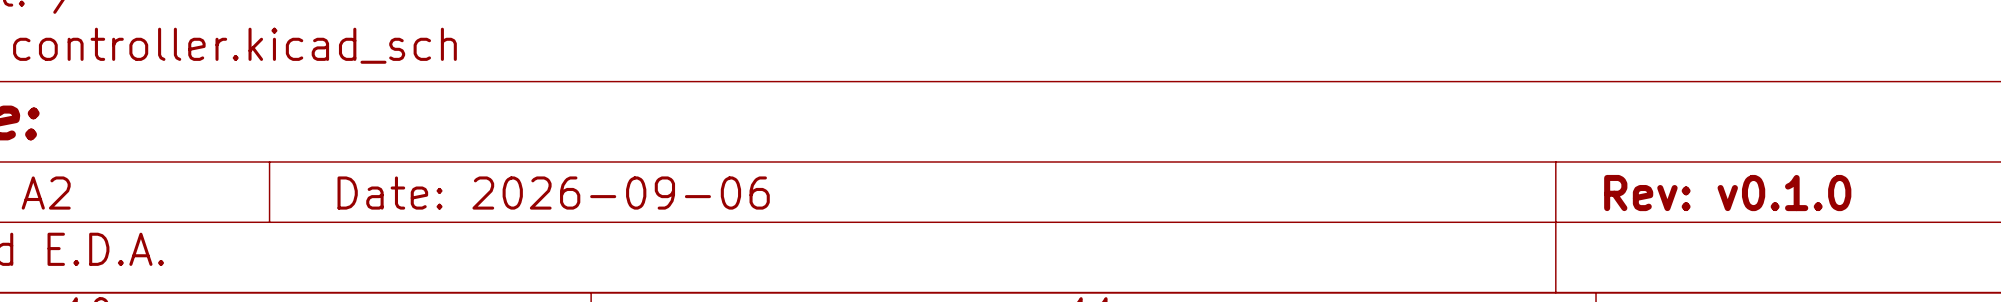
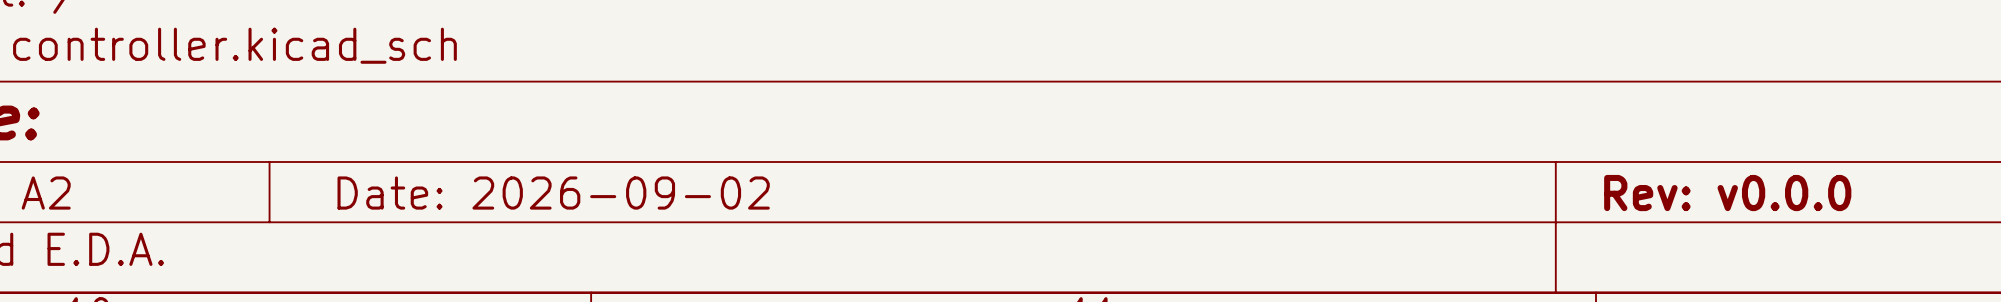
title block: Date: 2026-09-06 (553, 193) -> Date: 2026-09-02 (553, 193)
title block: Rev: v0.1.0 (1727, 193) -> Rev: v0.0.0 (1727, 193)

